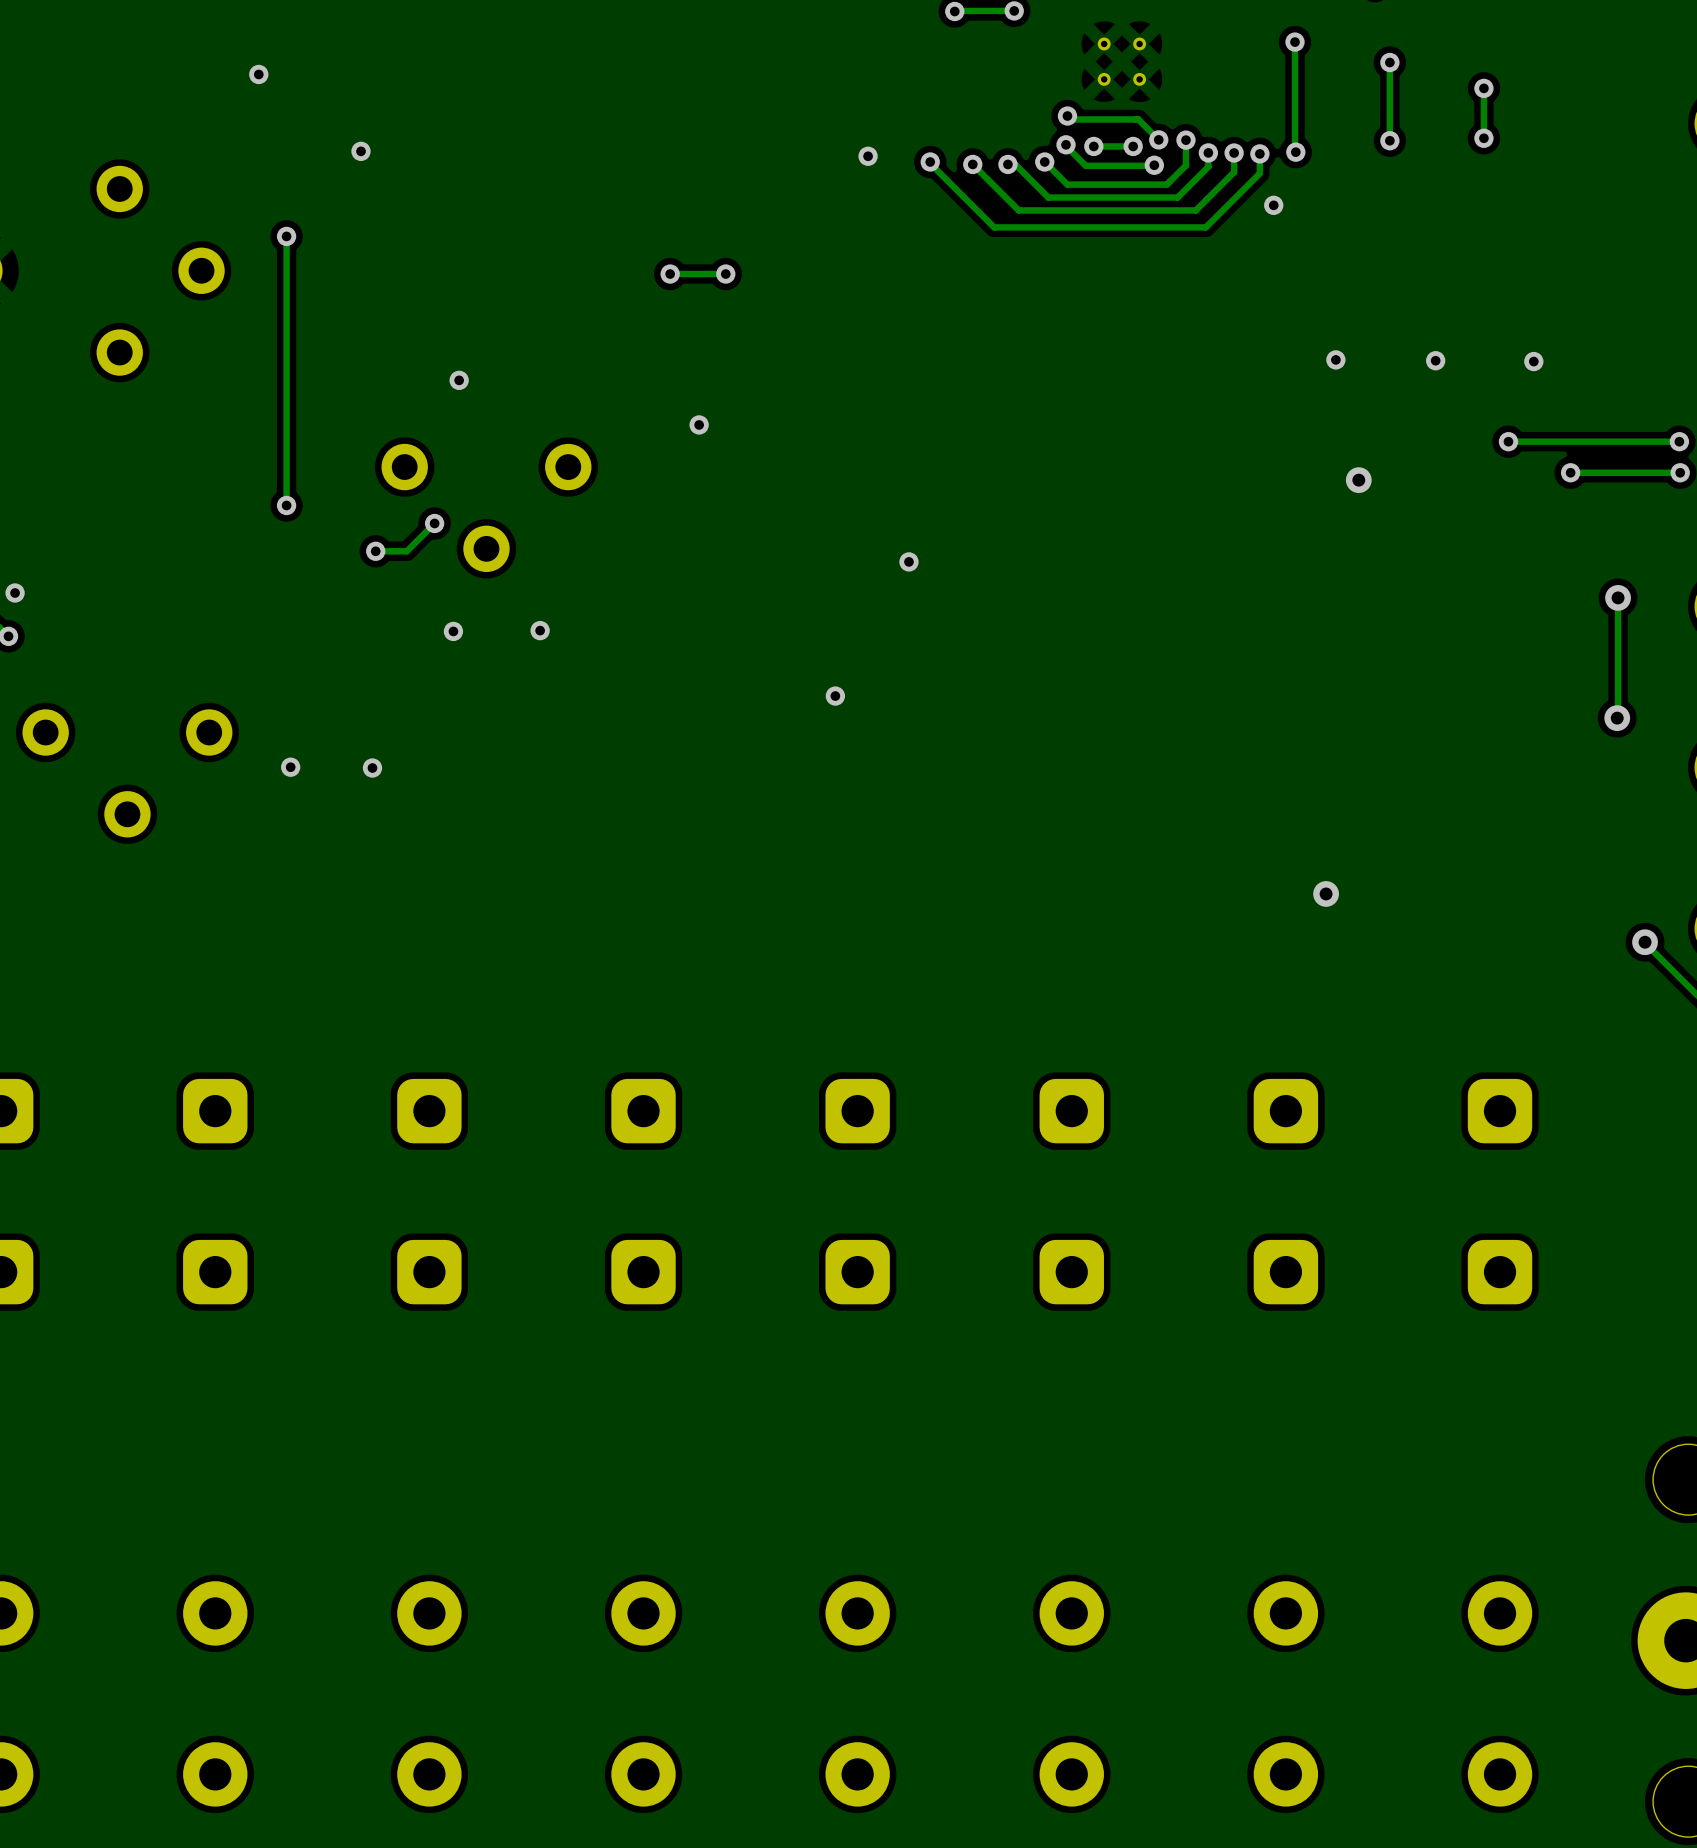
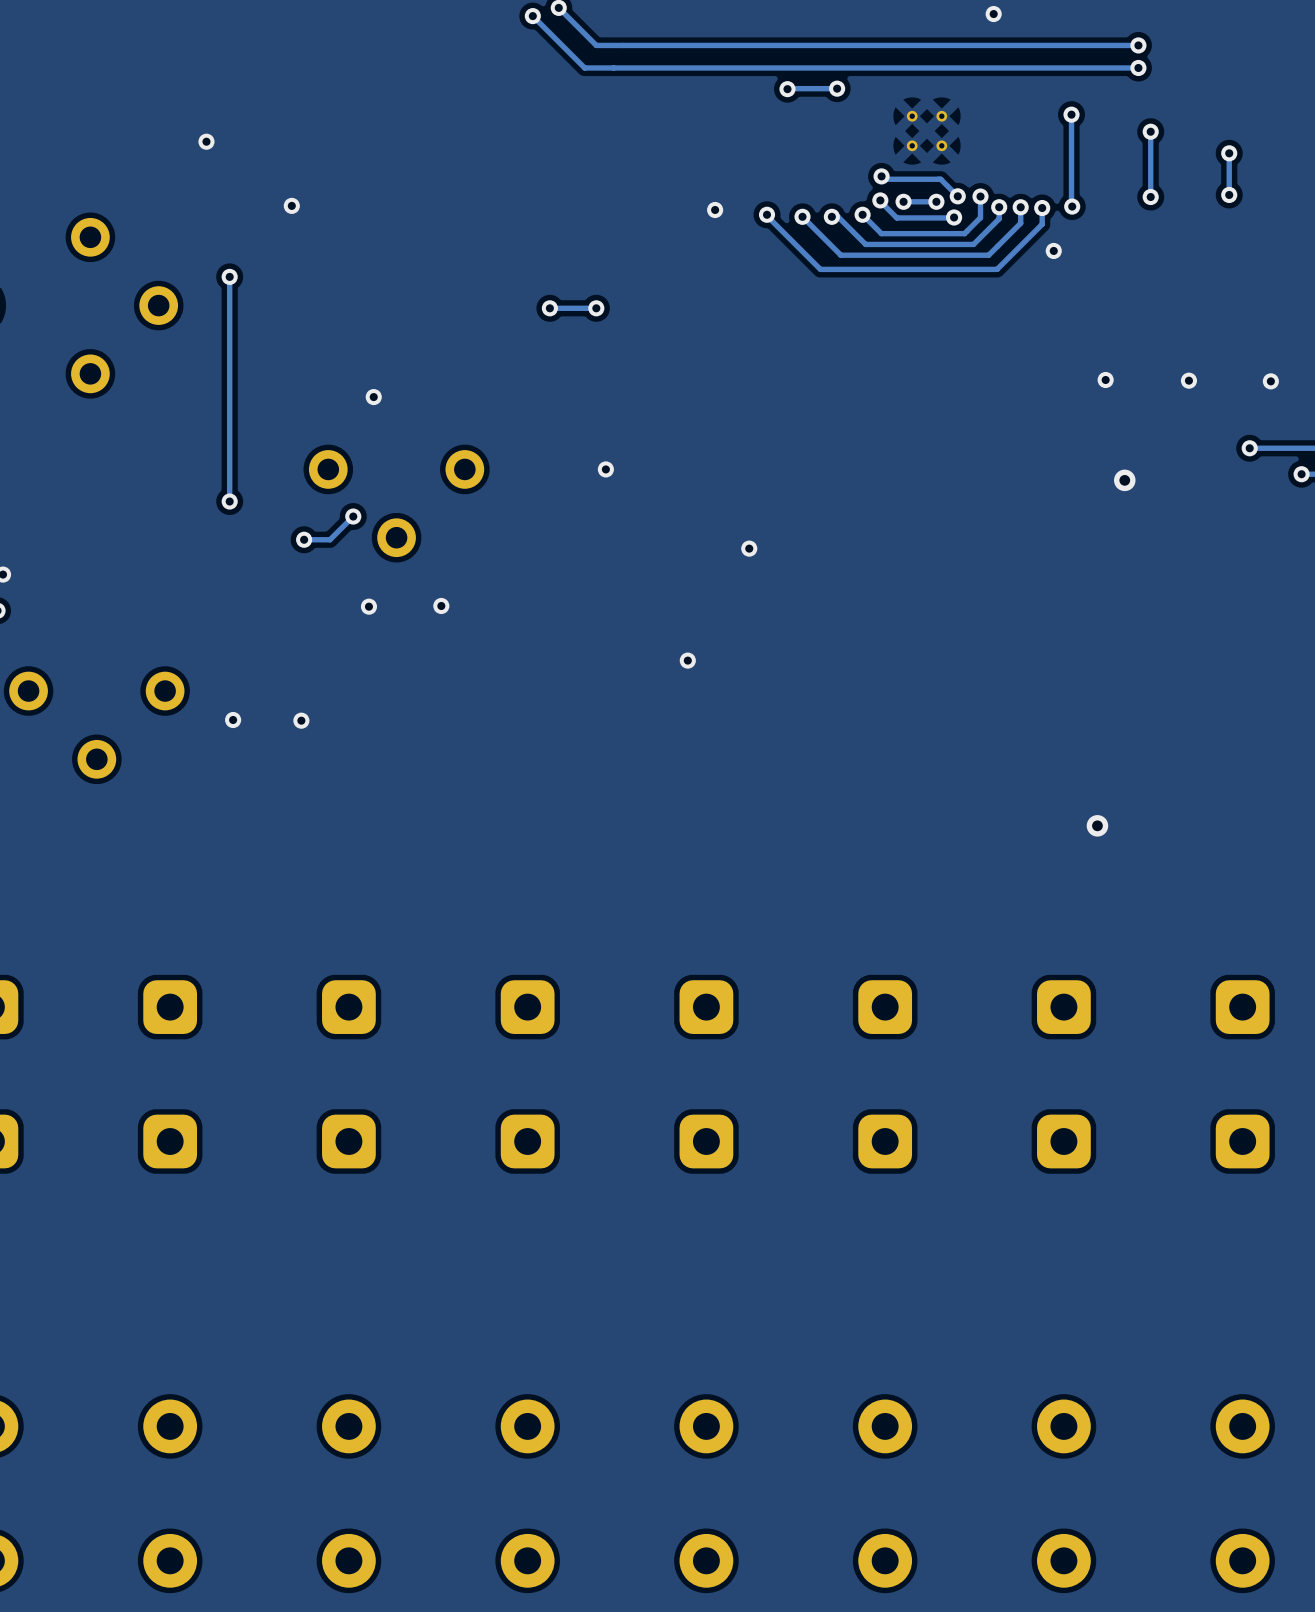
via position: (699, 424) -> (605, 469)

